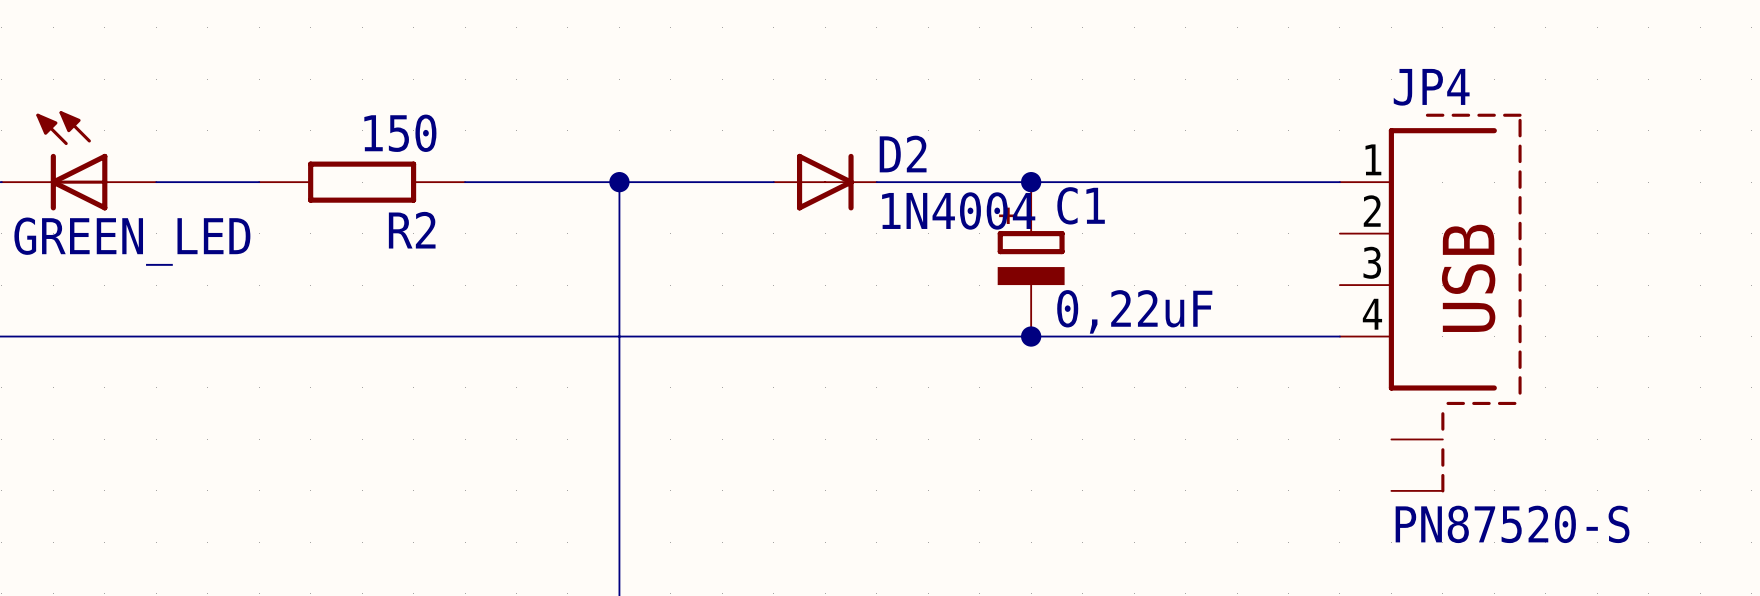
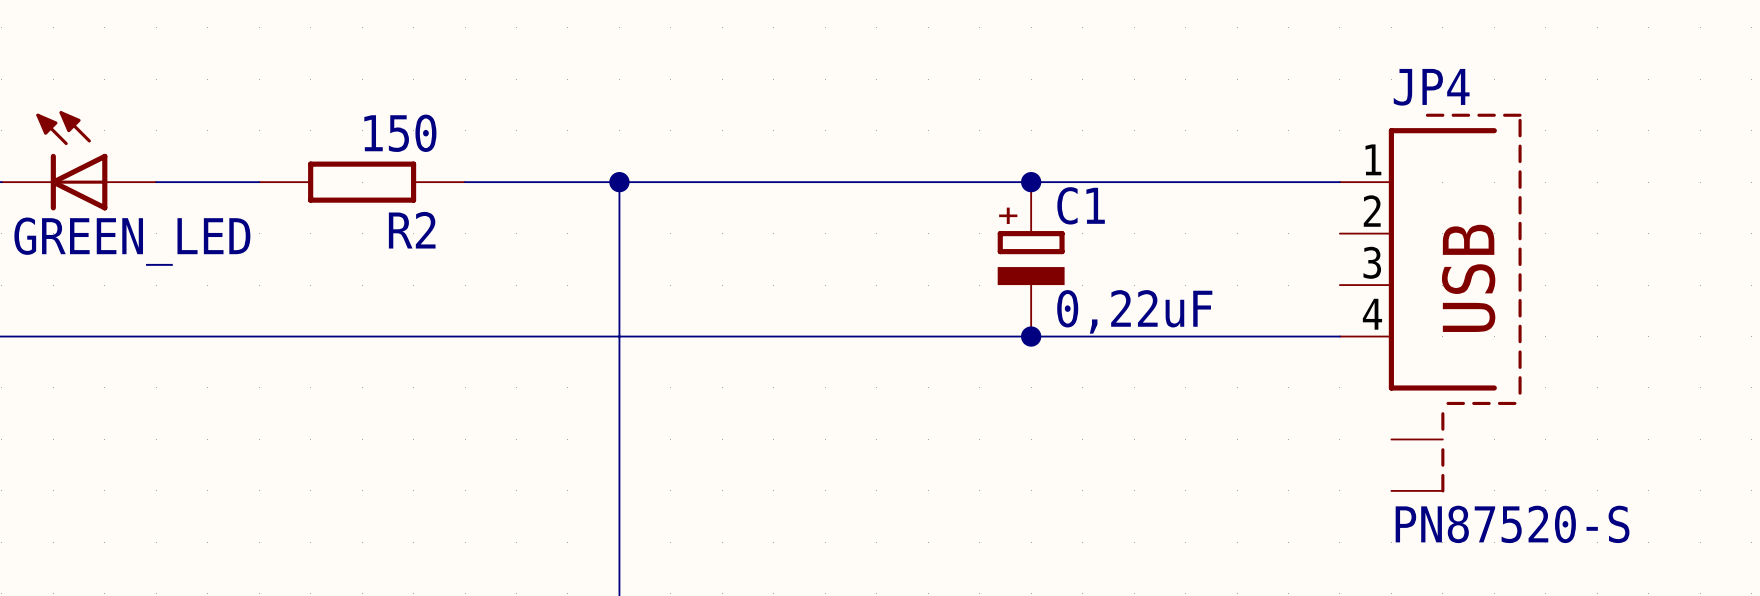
D2: 1N4004 (825, 182) -> none

